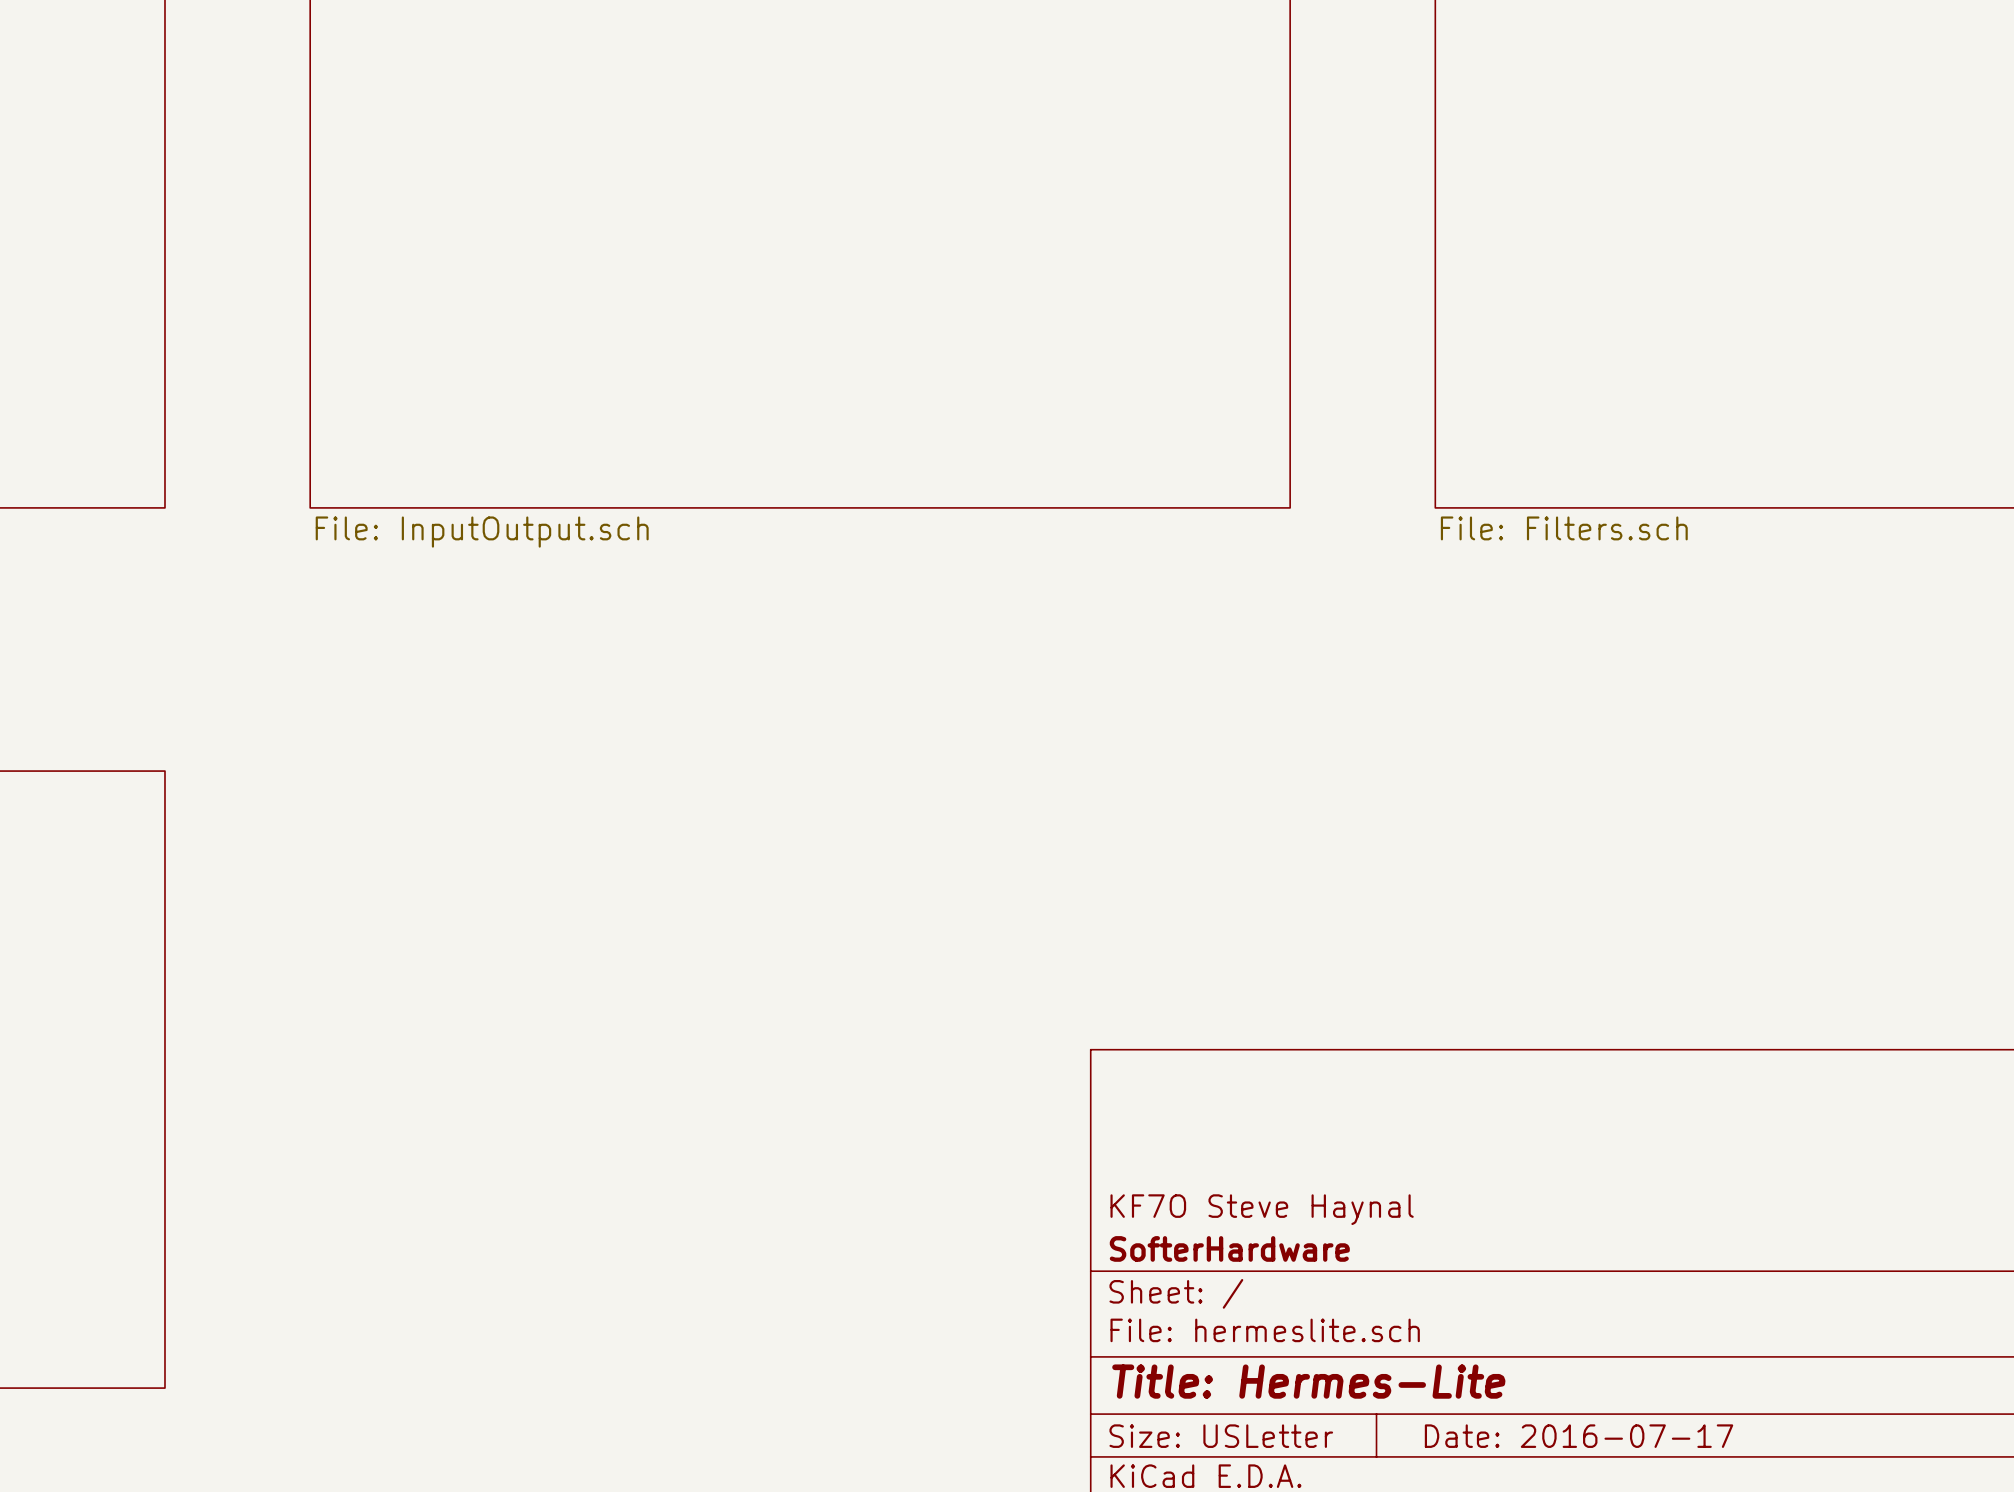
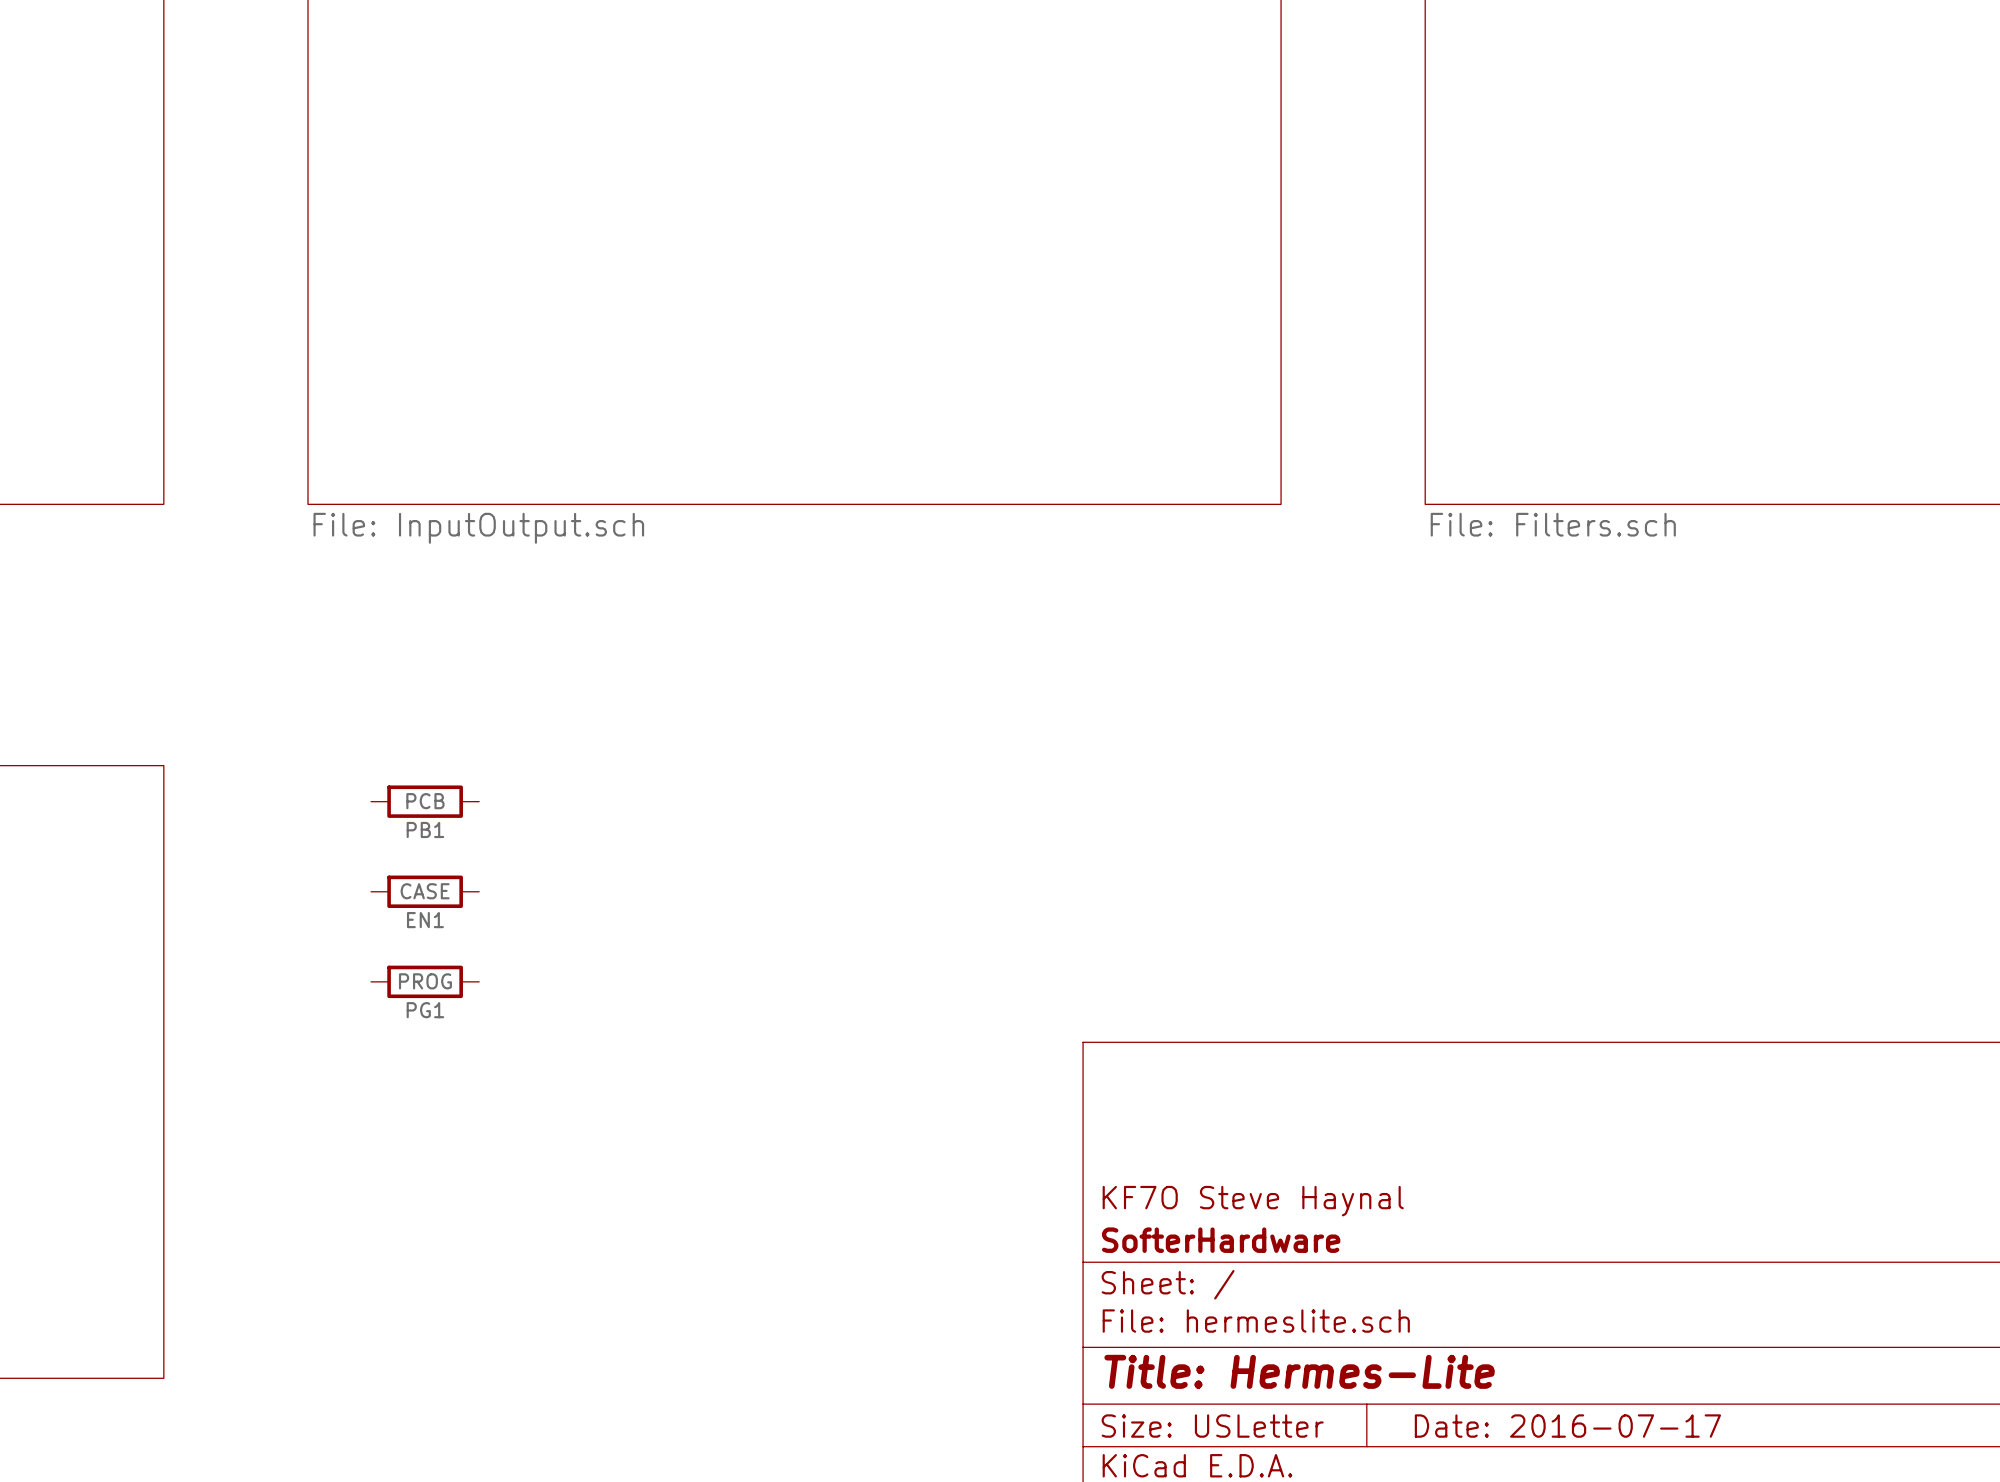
PB1: none -> PCB (425, 801)
EN1: none -> CASE (425, 891)
PG1: none -> PROG (425, 981)

